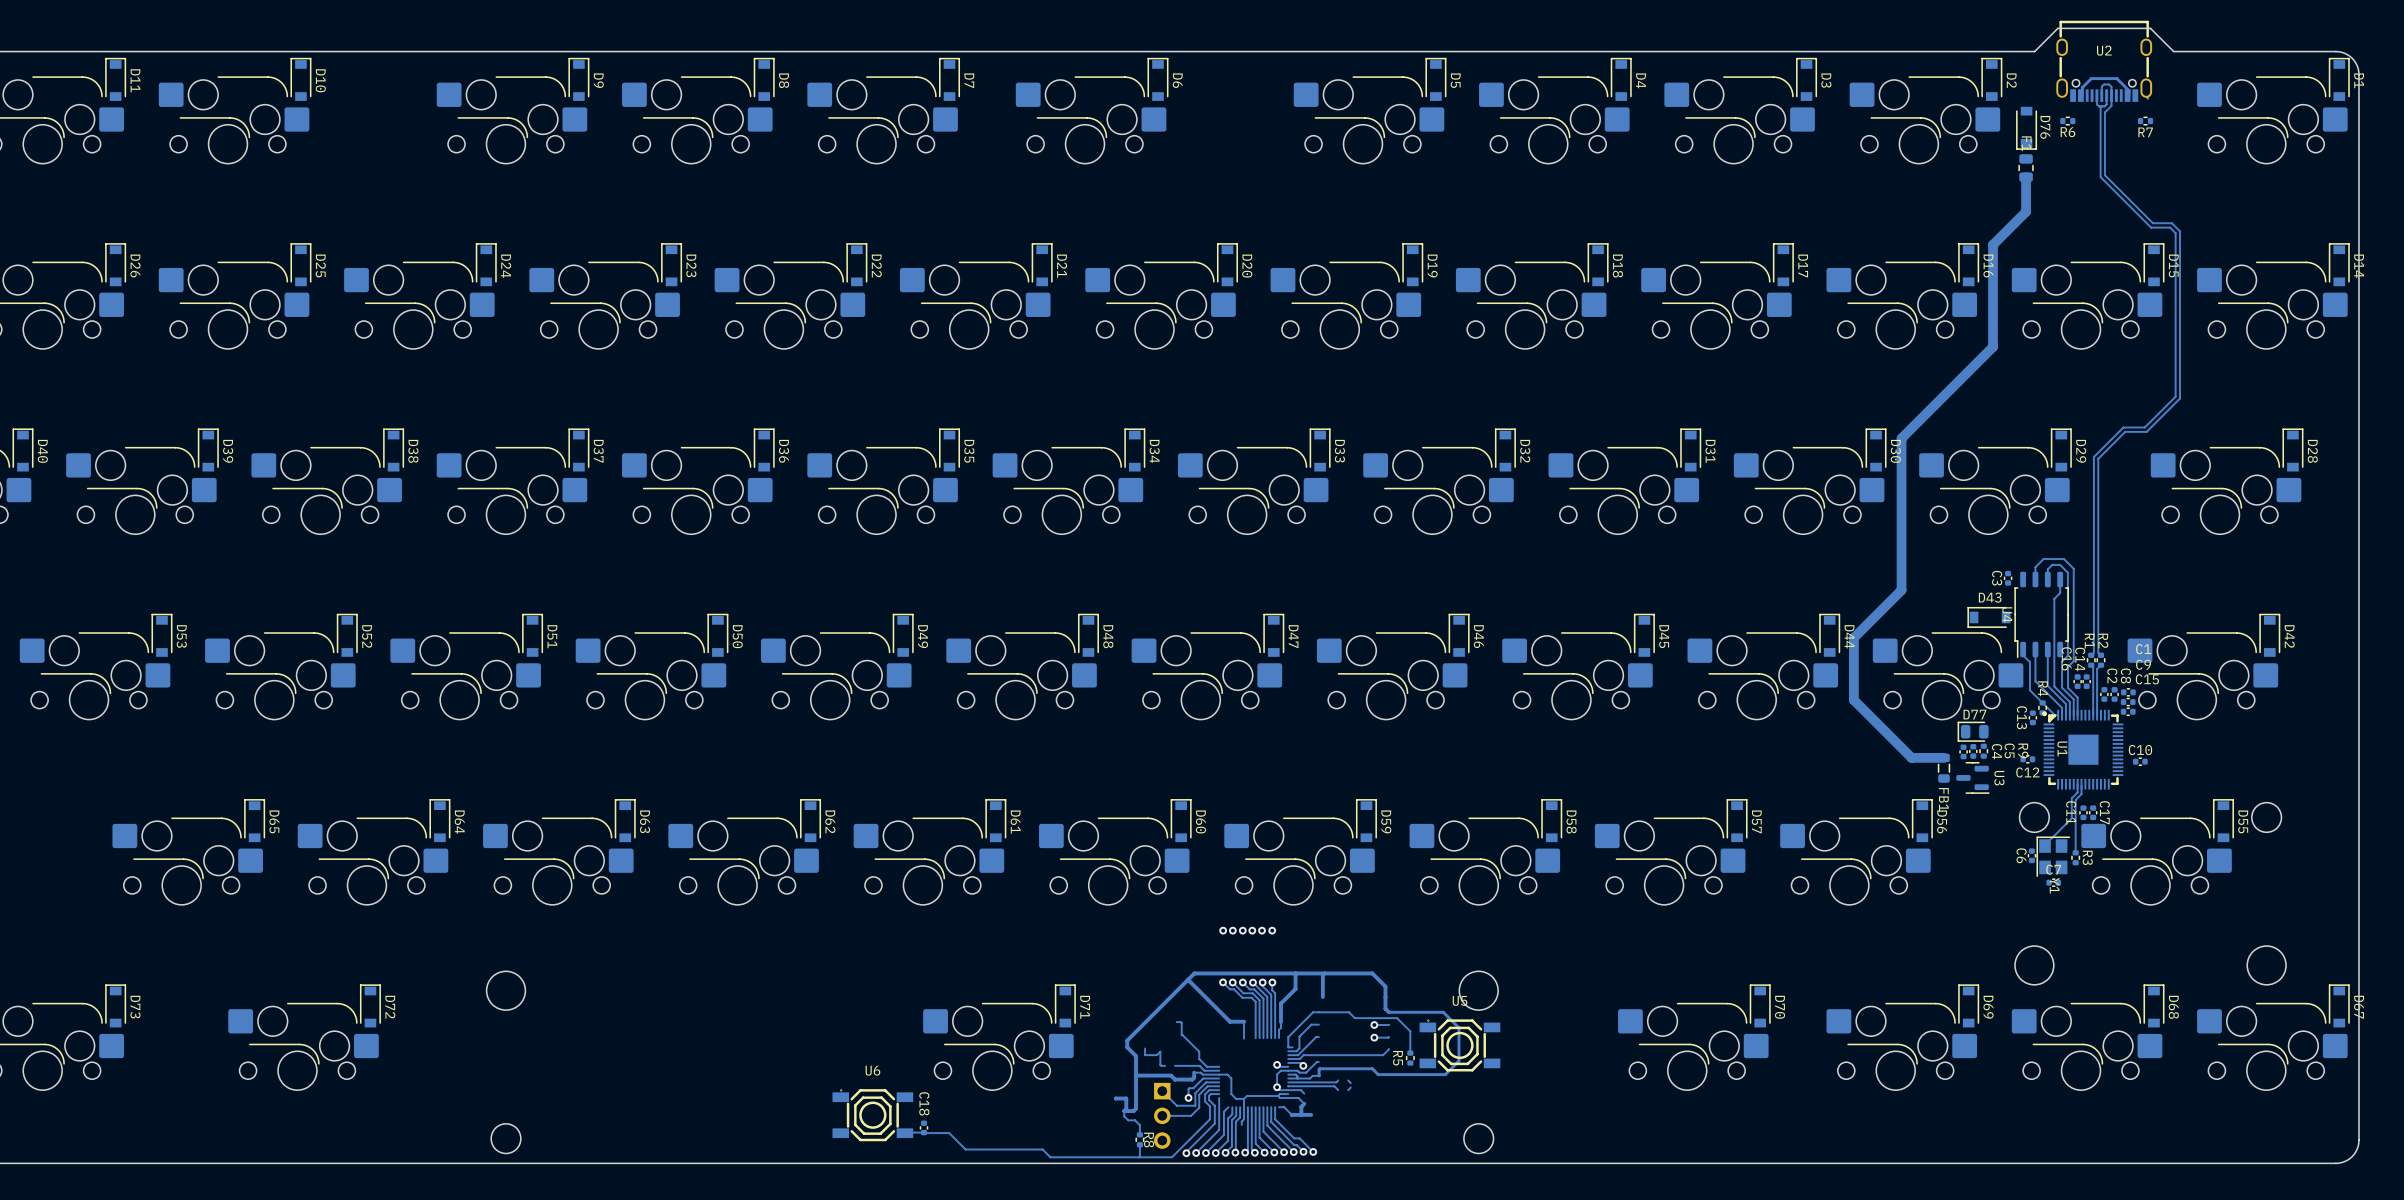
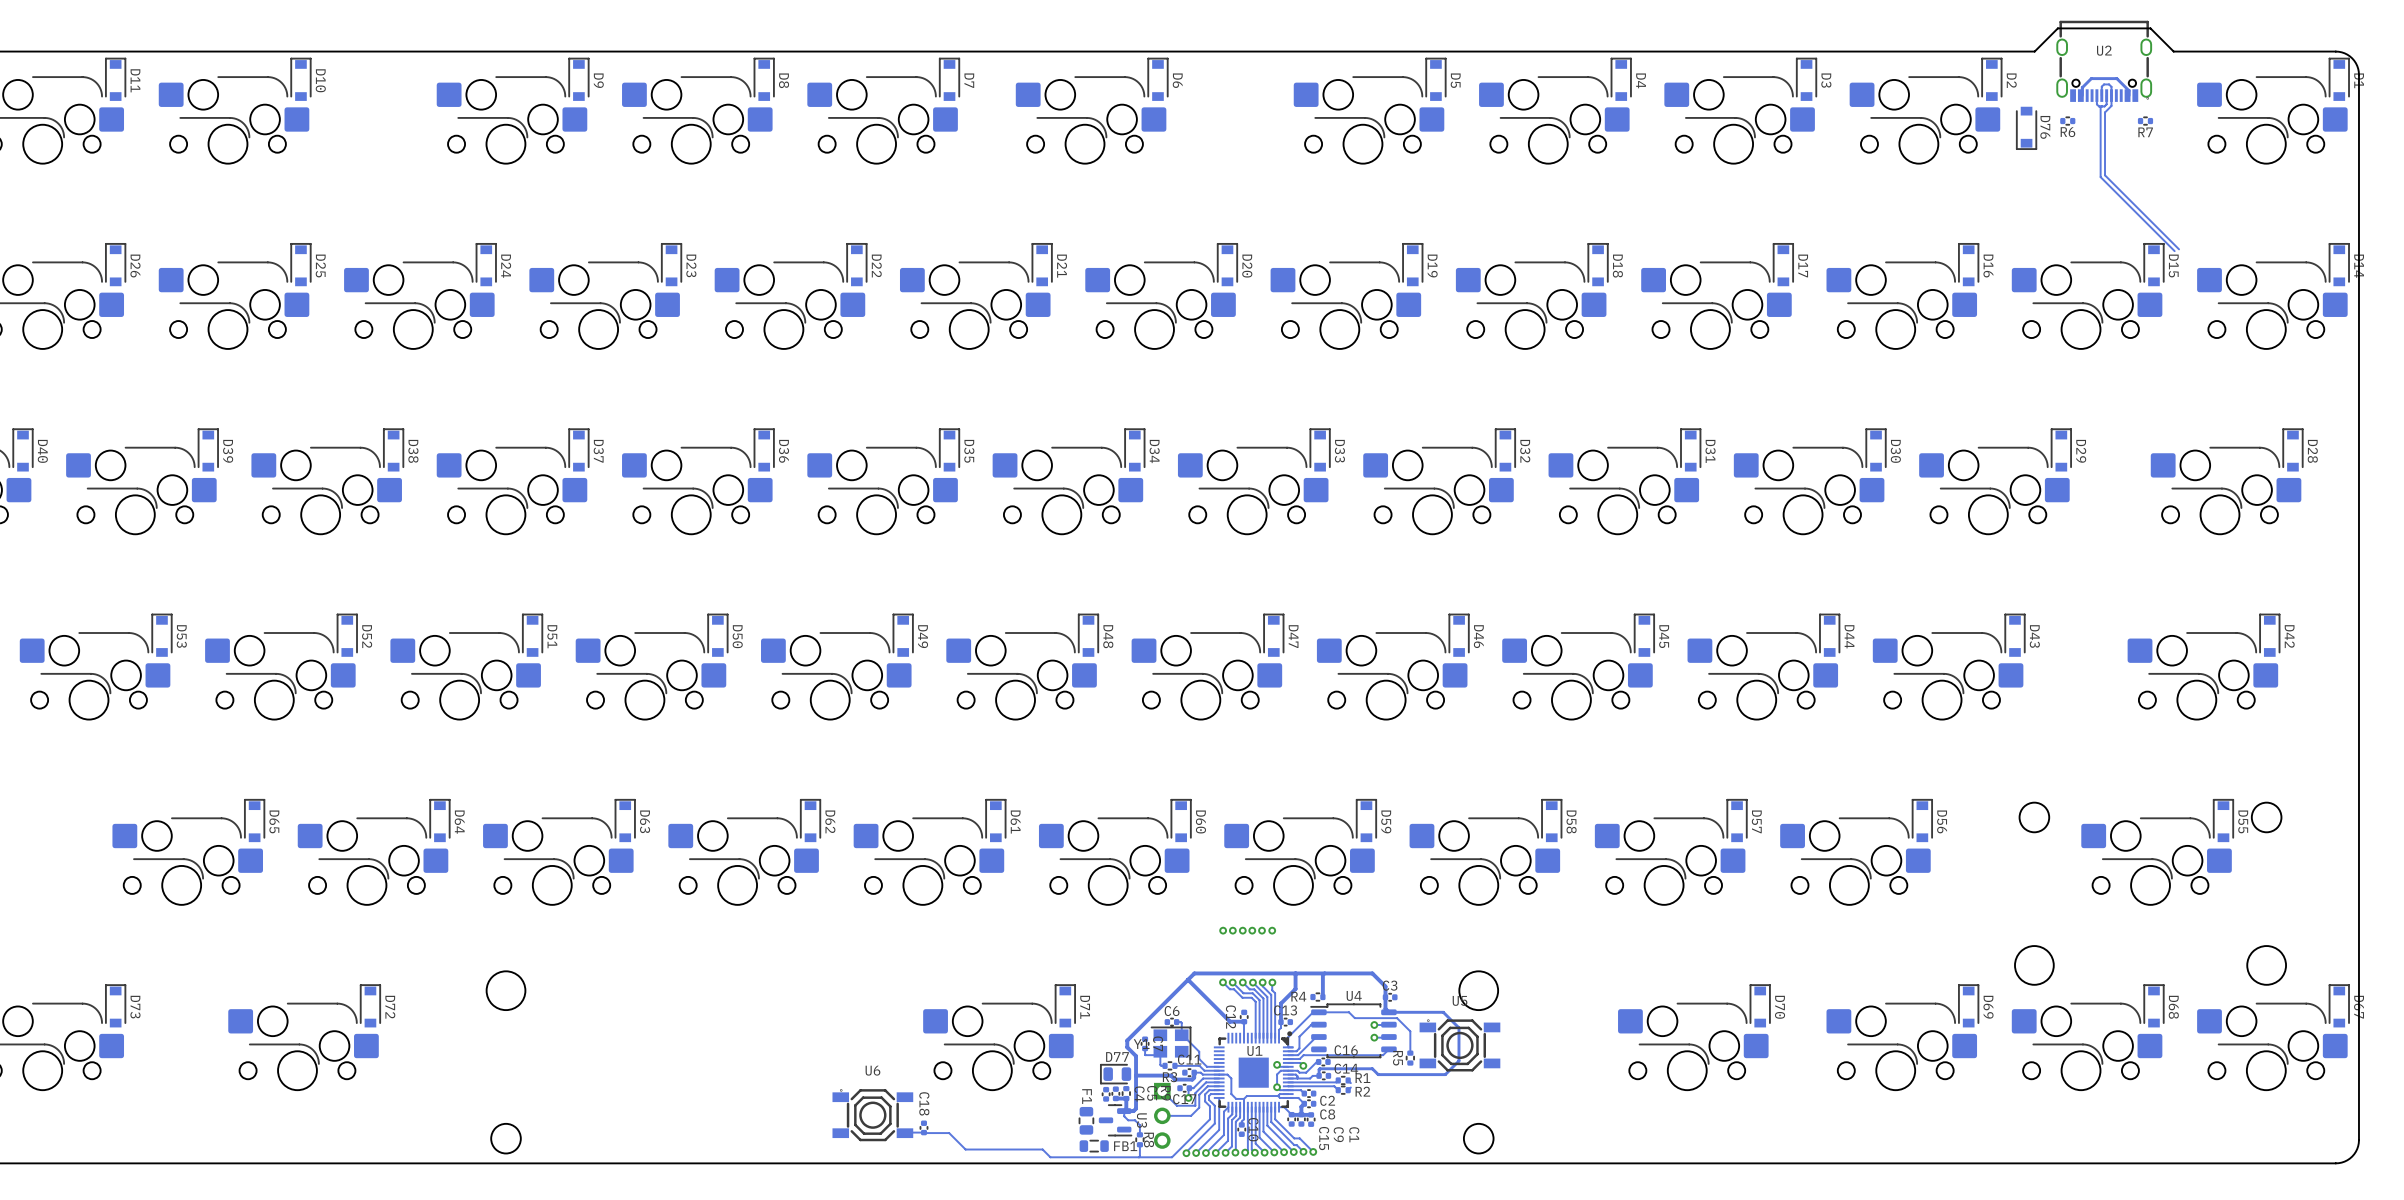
F1 position: (2026, 168) -> (1086, 1120)
track: (2026, 177) (2026, 211) (1993, 244) (1993, 347) (1901, 438) (1901, 590) (1853, 637) (1853, 700) (1911, 757) (1944, 757) -> none
track: (2152, 223) (2171, 223) (2180, 231) (2180, 398) (2146, 431) (2125, 431) (2098, 458) (2098, 652) (2100, 655) -> (2152, 223) (2179, 249)
track: (2151, 227) (2170, 227) (2175, 233) (2175, 396) (2144, 427) (2123, 427) (2093, 457) (2093, 652) (2091, 655) -> (2151, 227) (2174, 251)
C3 rotation: 0° (2008, 578) -> 90° clockwise (1390, 997)
C3 position: (2008, 578) -> (1390, 997)
track: (2035, 579) (2035, 567) (2043, 559) (2064, 559) (2073, 568) (2073, 661) (2068, 666) (2068, 687) (2077, 697) (2077, 715) -> none
track: (2047, 579) (2047, 569) (2052, 564) (2060, 564) (2067, 572) (2067, 655) (2062, 661) (2062, 687) (2073, 699) (2073, 715) -> none
track: (2060, 579) (2060, 593) (2054, 598) (2054, 686) (2069, 702) (2069, 715) -> none
U4 rotation: 0° (2041, 614) -> 90° clockwise (1353, 1030)
U4 position: (2041, 614) -> (1353, 1030)
D43 rotation: 0° (1989, 617) -> 90° clockwise (2015, 635)
D43 position: (1989, 617) -> (2015, 635)
track: (2023, 649) (2023, 655) (2029, 662) (2029, 690) (2054, 715) (2058, 715) -> none
track: (2035, 649) (2035, 681) (2062, 707) (2062, 715) -> none
track: (2047, 649) (2047, 685) (2065, 704) (2065, 715) -> none
R1 rotation: 0° (2091, 660) -> 90° clockwise (1343, 1080)
R1 position: (2091, 660) -> (1343, 1080)
R2 rotation: 0° (2100, 660) -> 90° clockwise (1343, 1090)
R2 position: (2100, 660) -> (1343, 1090)
track: (2091, 665) (2093, 667) (2093, 715) -> none
track: (2100, 665) (2097, 669) (2097, 715) -> none
C16 rotation: 0° (2077, 681) -> 90° clockwise (1323, 1061)
C16 position: (2077, 681) -> (1323, 1061)
C14 rotation: 0° (2086, 681) -> 90° clockwise (1323, 1075)
C14 position: (2086, 681) -> (1323, 1075)
R4 name position: R4 (2042, 688) -> R4 (1298, 996)
C1 rotation: 0° (2128, 692) -> 90° clockwise (1311, 1119)
C1 position: (2128, 692) -> (1311, 1119)
C2 rotation: 0° (2104, 694) -> 90° clockwise (1308, 1093)
C2 position: (2104, 694) -> (1308, 1093)
C8 rotation: 0° (2114, 694) -> 90° clockwise (1308, 1103)
C8 position: (2114, 694) -> (1308, 1103)
C9 rotation: 0° (2128, 702) -> 90° clockwise (1301, 1119)
C9 position: (2128, 702) -> (1301, 1119)
R4 rotation: 0° (2042, 707) -> 90° clockwise (1317, 997)
R4 position: (2042, 707) -> (1317, 997)
C15 rotation: 0° (2128, 711) -> 90° clockwise (1291, 1119)
C15 position: (2128, 711) -> (1291, 1119)
C13 rotation: 0° (2032, 717) -> 90° clockwise (1285, 1022)
C13 position: (2032, 717) -> (1285, 1022)
D77 position: (1973, 731) -> (1115, 1074)
U1 rotation: 0° (2082, 749) -> 90° clockwise (1253, 1071)
U1 position: (2082, 749) -> (1253, 1071)
C4 position: (1963, 751) -> (1106, 1094)
C5 position: (1973, 751) -> (1115, 1093)
R9 position: (1983, 751) -> (1126, 1093)
C12 rotation: 0° (2027, 759) -> 90° clockwise (1244, 1017)
C12 position: (2027, 759) -> (1244, 1017)
C10 rotation: 0° (2140, 761) -> 90° clockwise (1241, 1129)
C10 position: (2140, 761) -> (1241, 1129)
FB1 rotation: 0° (1944, 768) -> 90° clockwise (1094, 1146)
FB1 position: (1944, 768) -> (1094, 1146)
U3 position: (1972, 777) -> (1115, 1120)
track: (2077, 784) (2077, 792) (2071, 798) (2071, 818) (2045, 846) -> none
track: (2081, 785) (2081, 794) (2075, 799) (2075, 852) -> none
FB1 name position: FB1 (1943, 799) -> FB1 (1125, 1146)
C11 rotation: 0° (2083, 812) -> 90° clockwise (1189, 1072)
C11 position: (2083, 812) -> (1189, 1072)
C17 rotation: 0° (2093, 812) -> 90° clockwise (1184, 1088)
C17 position: (2093, 812) -> (1184, 1088)
C6 rotation: 0° (2031, 855) -> 90° clockwise (1172, 1022)
C6 position: (2031, 855) -> (1172, 1022)
Y1 rotation: 0° (2053, 856) -> 90° clockwise (1171, 1043)
Y1 position: (2053, 856) -> (1171, 1043)
R3 rotation: 0° (2075, 857) -> 90° clockwise (1169, 1065)
R3 position: (2075, 857) -> (1169, 1065)
C7 rotation: 0° (2053, 882) -> 90° clockwise (1145, 1043)
C7 position: (2053, 882) -> (1145, 1043)

